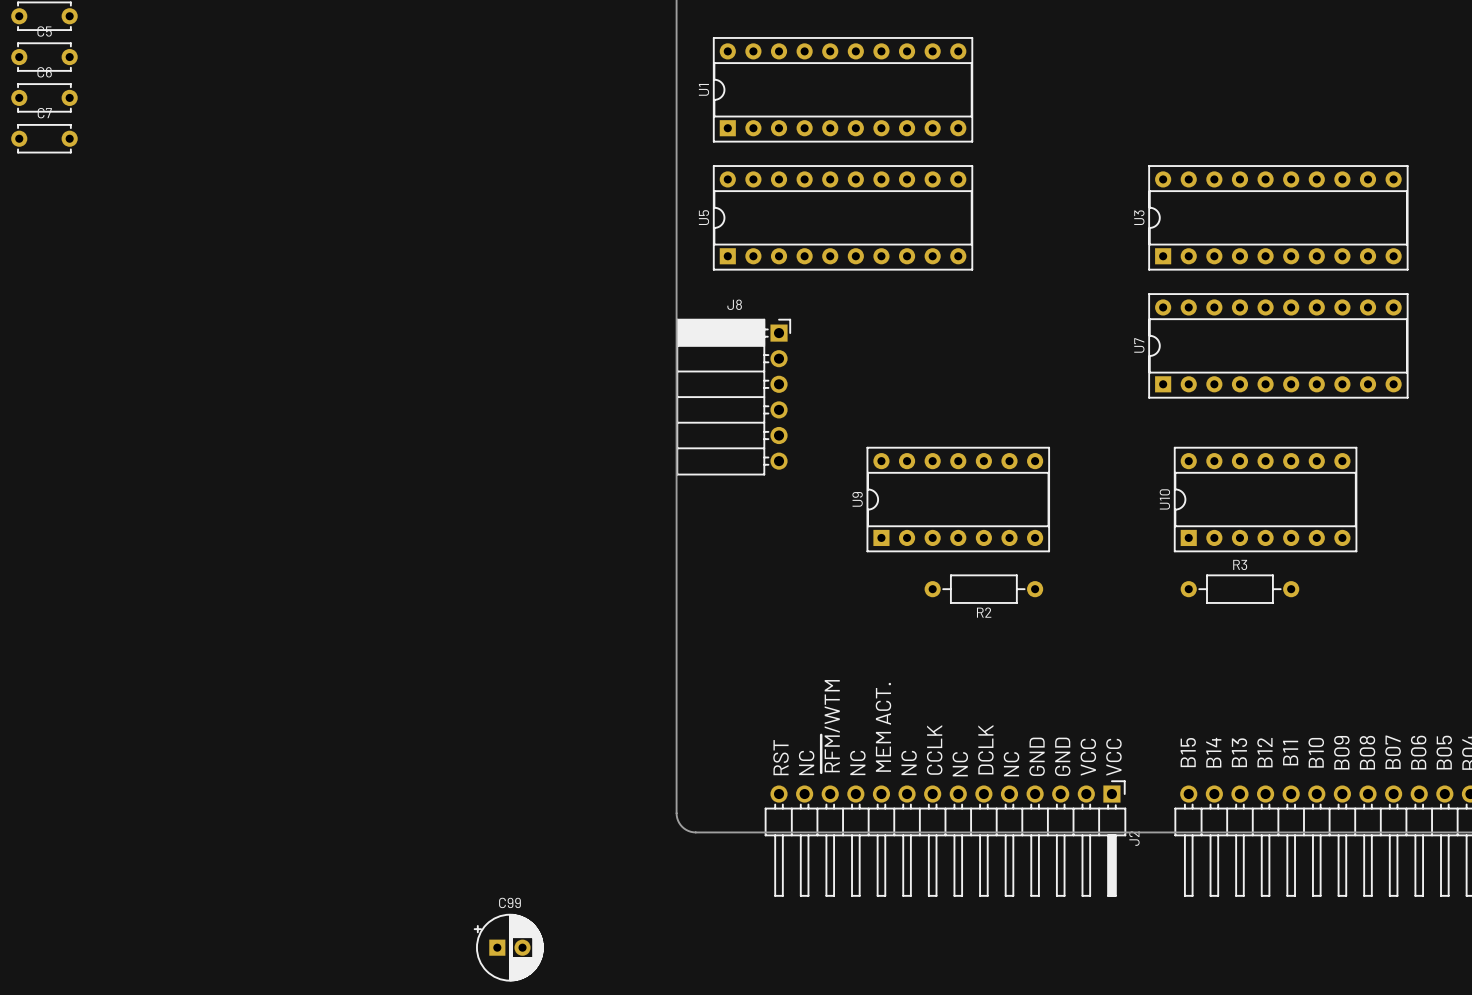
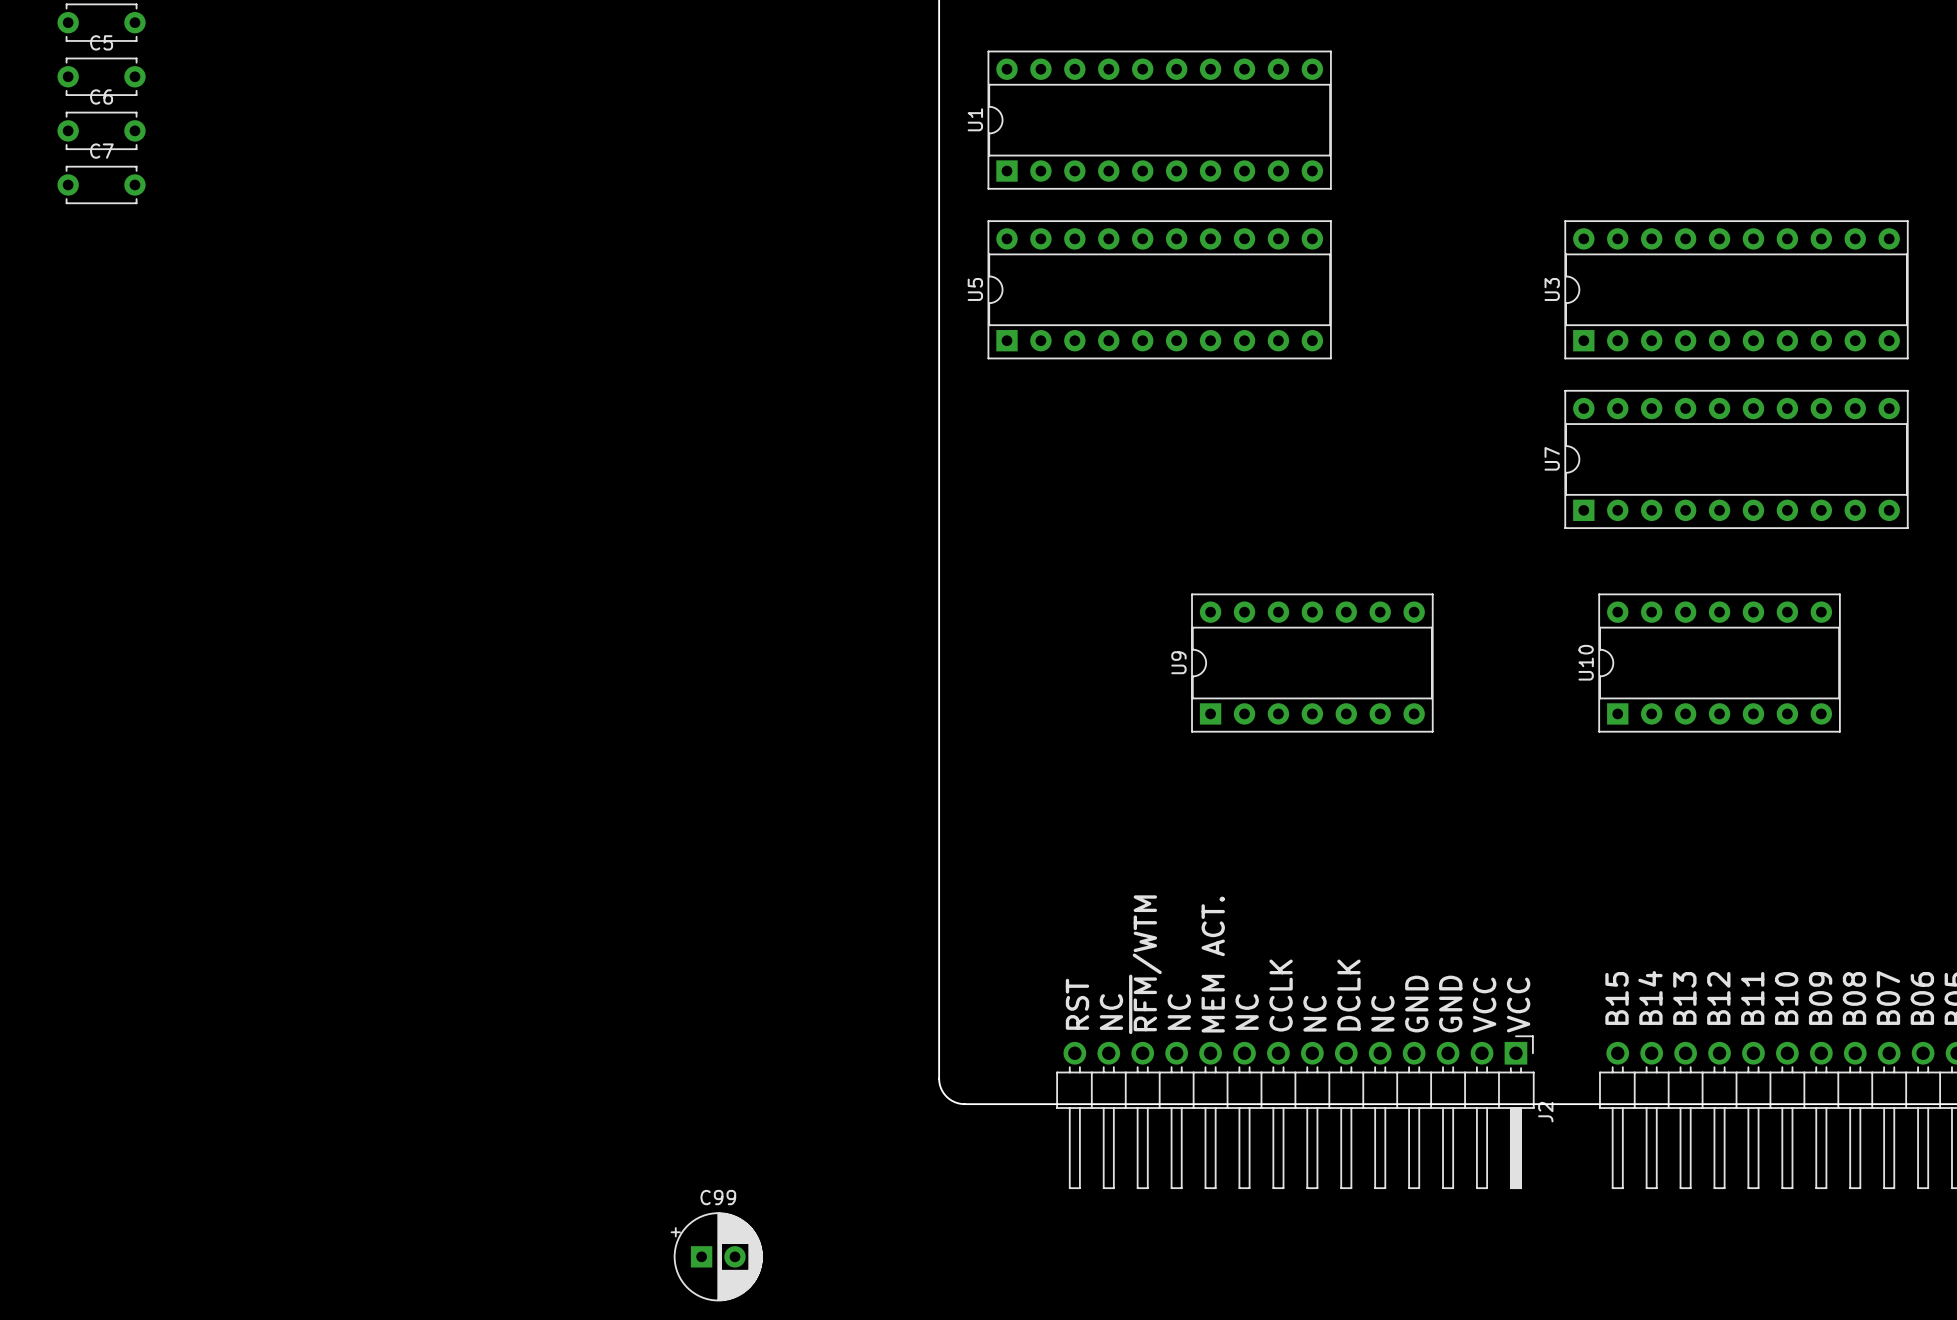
J8: (733, 397) -> none
R2: (983, 589) -> none
R3: (1239, 589) -> none

